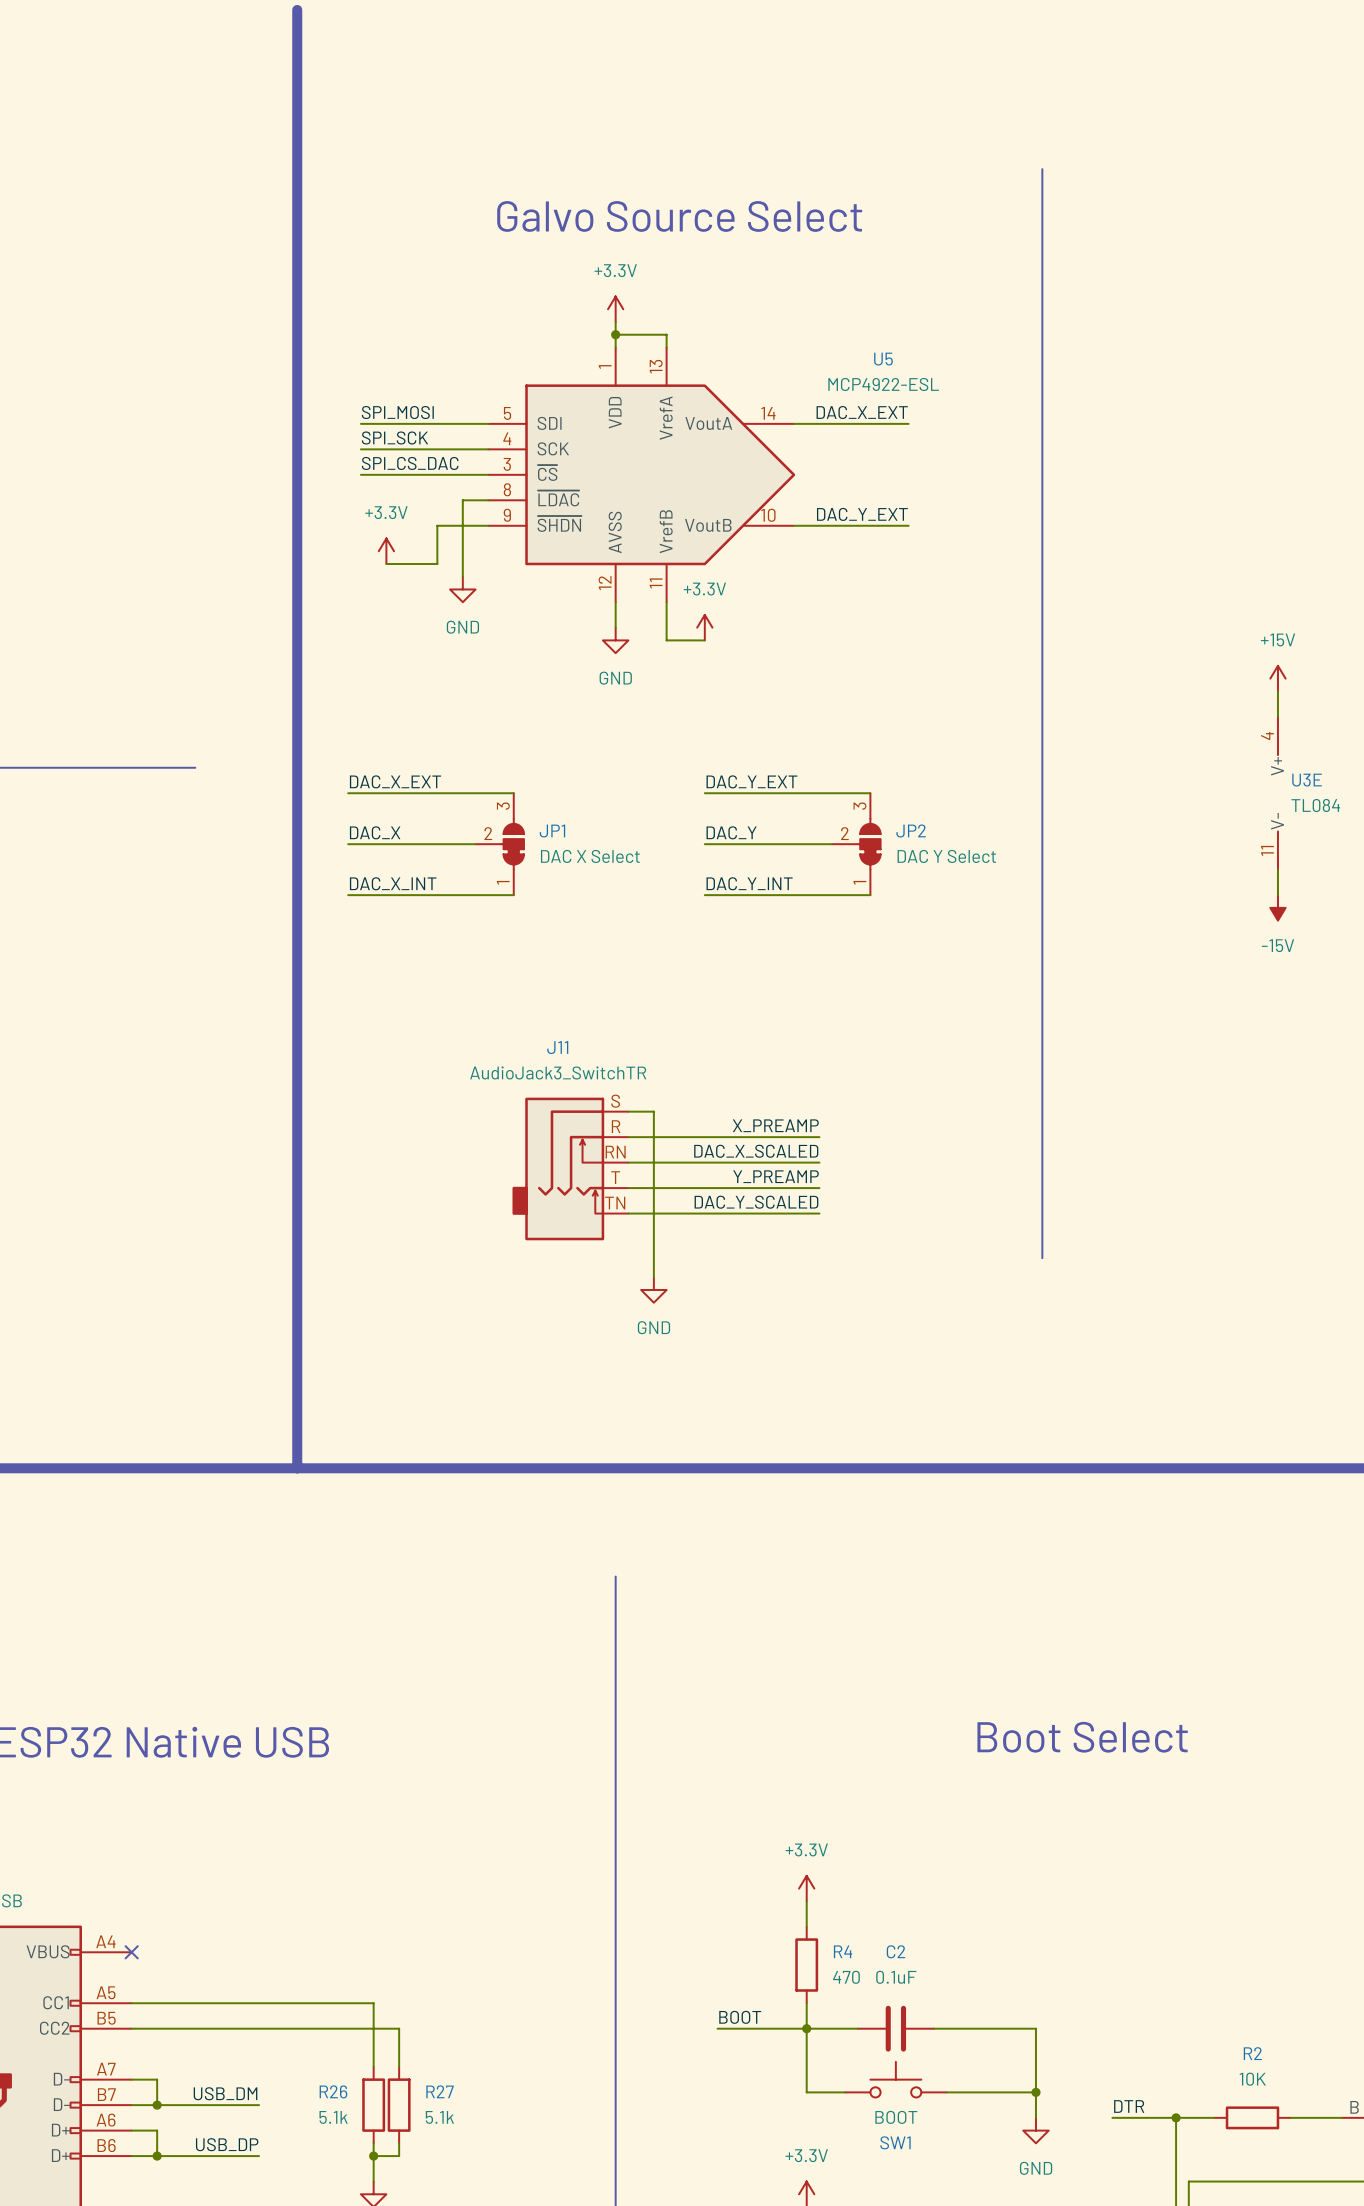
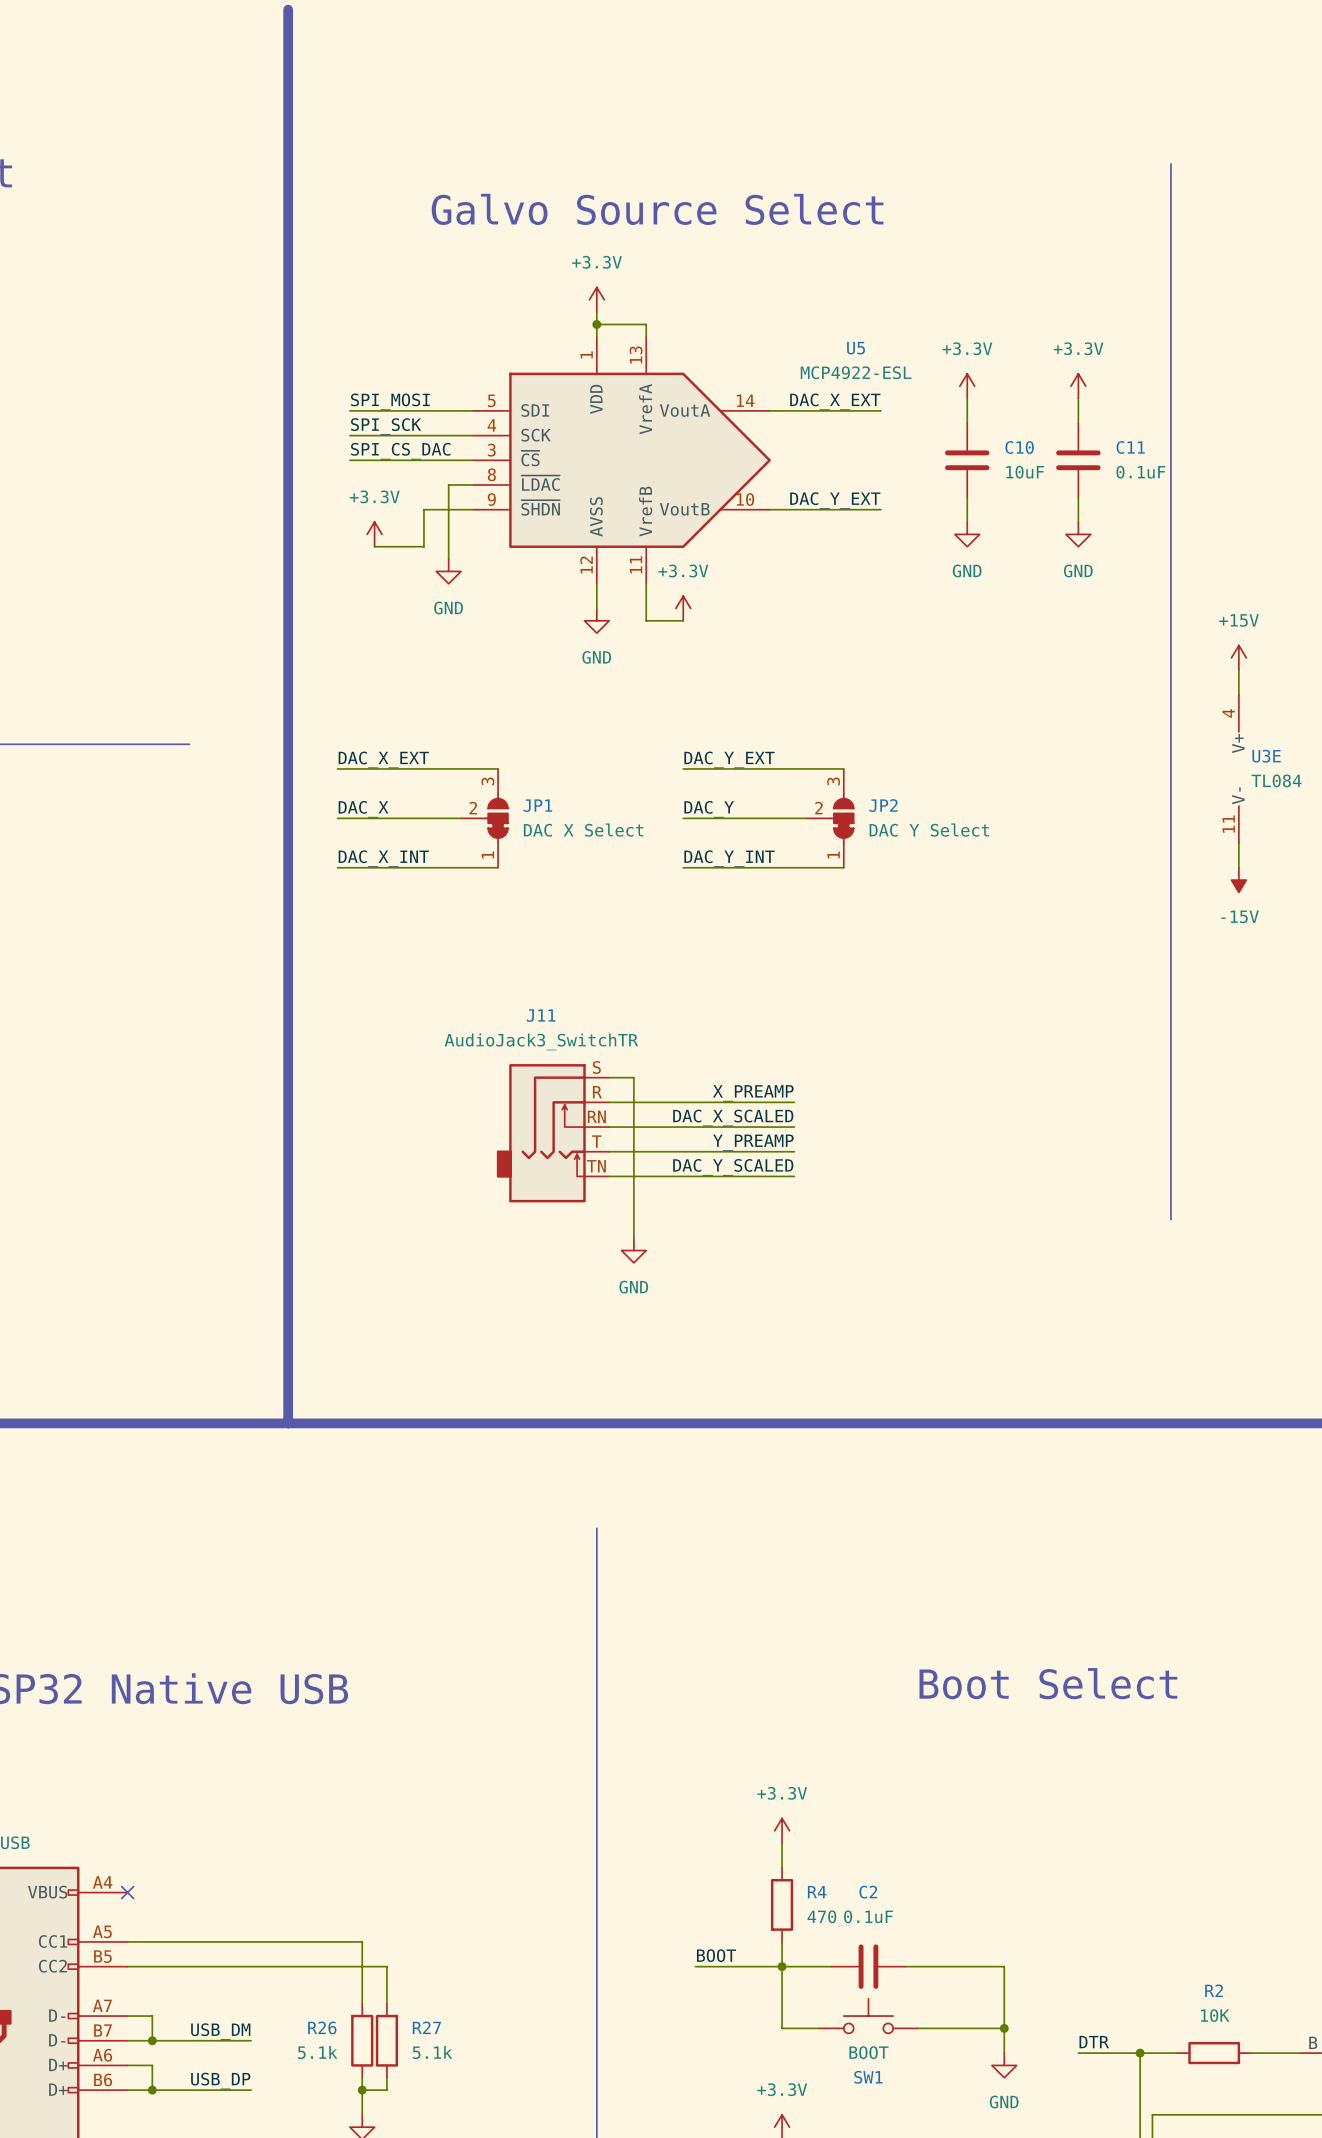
line: (1042, 169) (1042, 1258) -> (1170, 163) (1170, 1219)
power symbol: none -> +3.3V (967, 386)
power symbol: none -> +3.3V (1078, 386)
wire: none -> (967, 398) (967, 423)
wire: none -> (1078, 398) (1078, 423)
C10: none -> 10uF (967, 460)
C11: none -> 0.1uF (1078, 460)
wire: none -> (967, 497) (967, 522)
wire: none -> (1078, 497) (1078, 522)
power symbol: none -> GND (967, 534)
power symbol: none -> GND (1078, 534)

